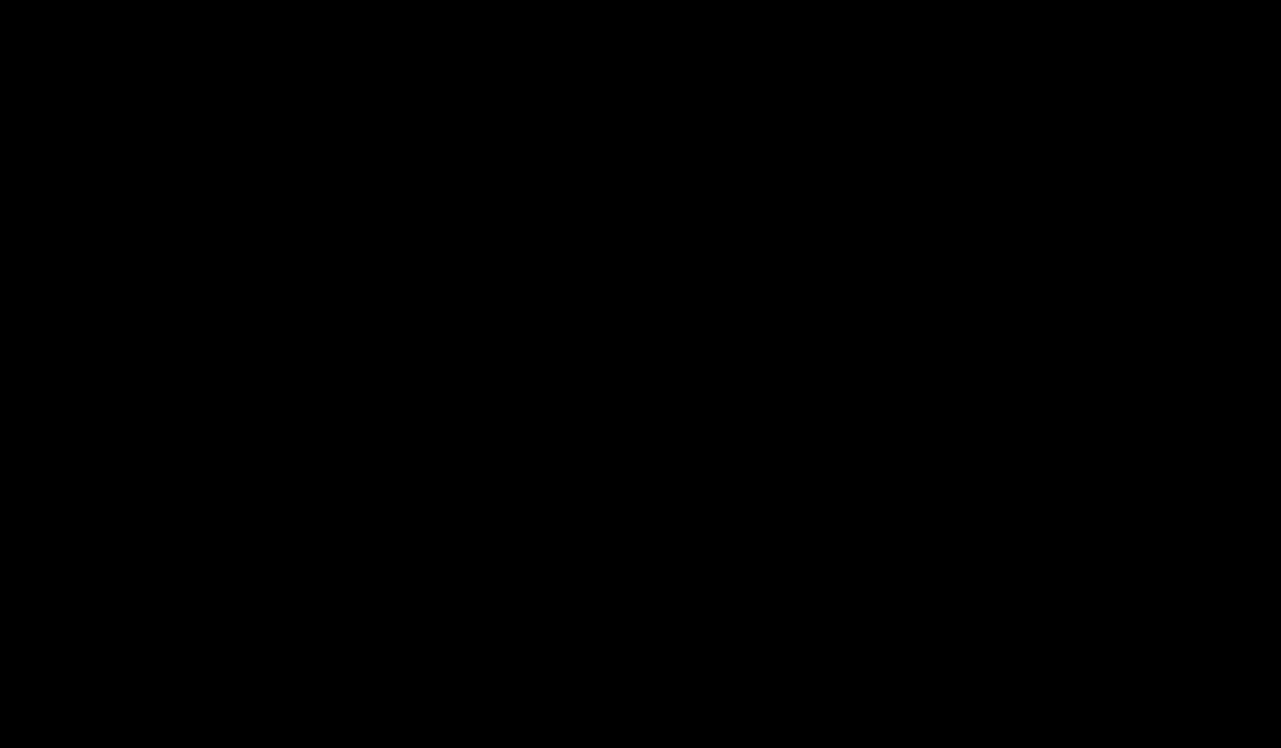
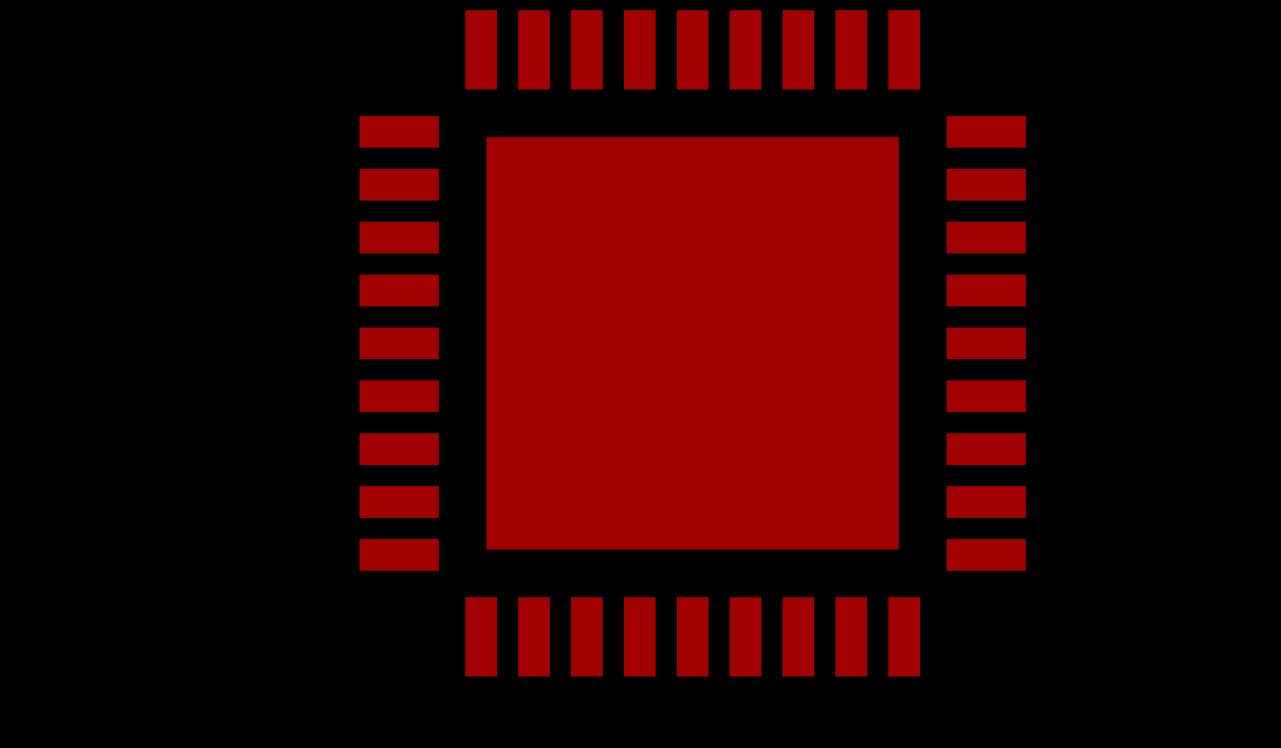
part: none -> (692, 343)

